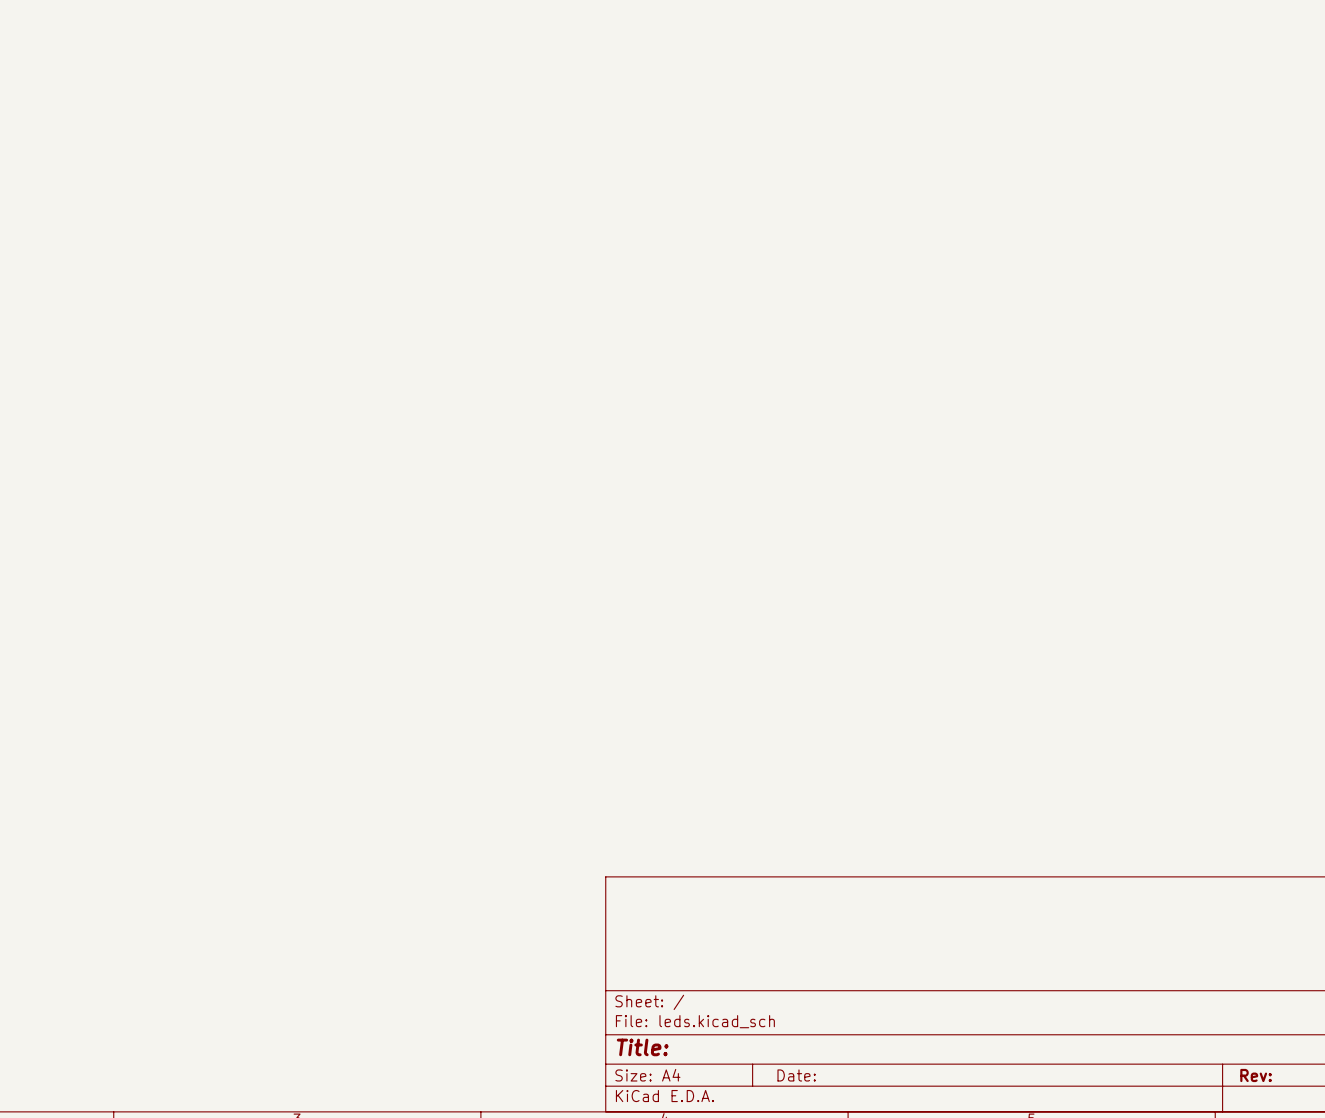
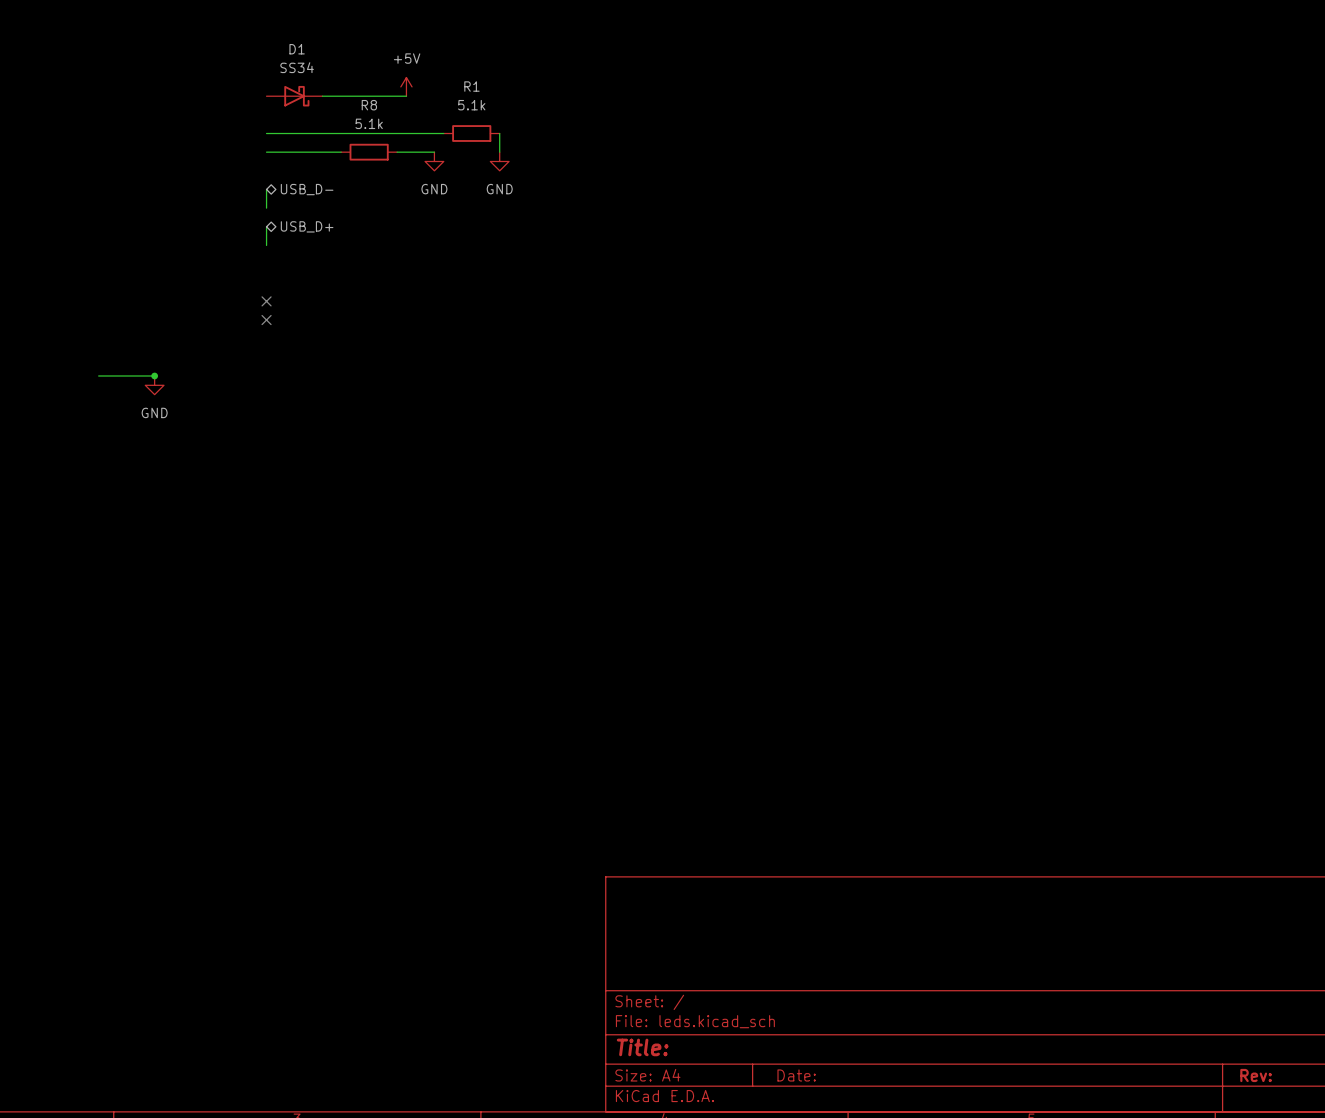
power symbol: none -> +5V (406, 86)
D1: none -> SS34 (294, 96)
wire: none -> (322, 96) (406, 96)
wire: none -> (266, 133) (443, 133)
R1: none -> 5.1k (471, 133)
wire: none -> (499, 133) (499, 152)
wire: none -> (266, 152) (341, 152)
R8: none -> 5.1k (369, 152)
wire: none -> (397, 152) (434, 152)
power symbol: none -> GND (434, 161)
power symbol: none -> GND (499, 161)
wire: none -> (266, 189) (266, 208)
hierarchical label: none -> USB_D- (307, 189)
wire: none -> (266, 226) (266, 245)
hierarchical label: none -> USB_D+ (307, 226)
no-connect mark: none -> (266, 301)
no-connect mark: none -> (266, 320)
wire: none -> (98, 375) (154, 375)
junction: none -> (154, 375)
power symbol: none -> GND (154, 385)

